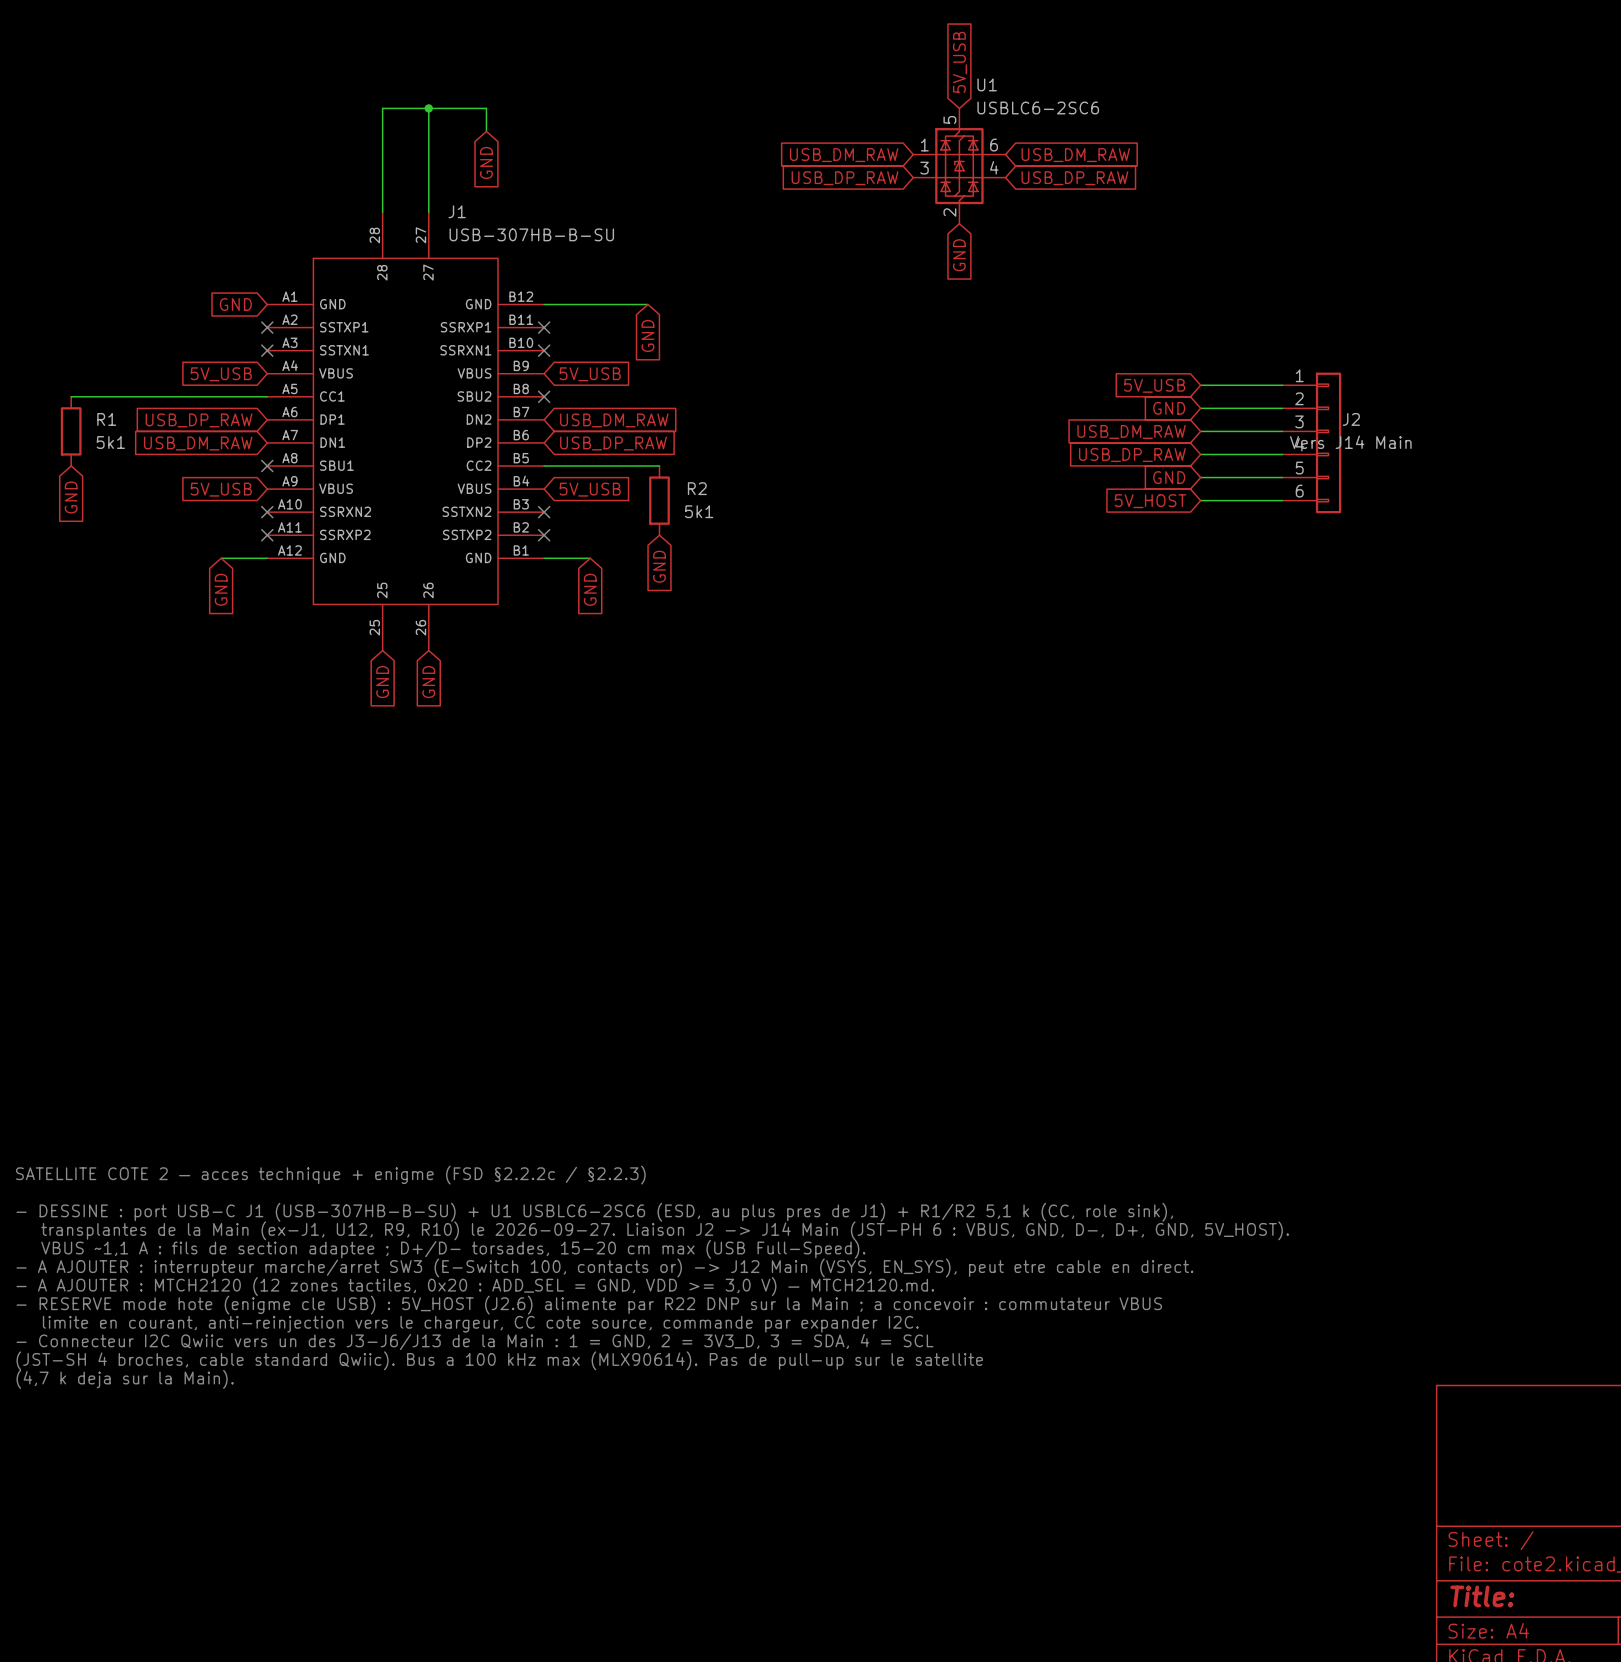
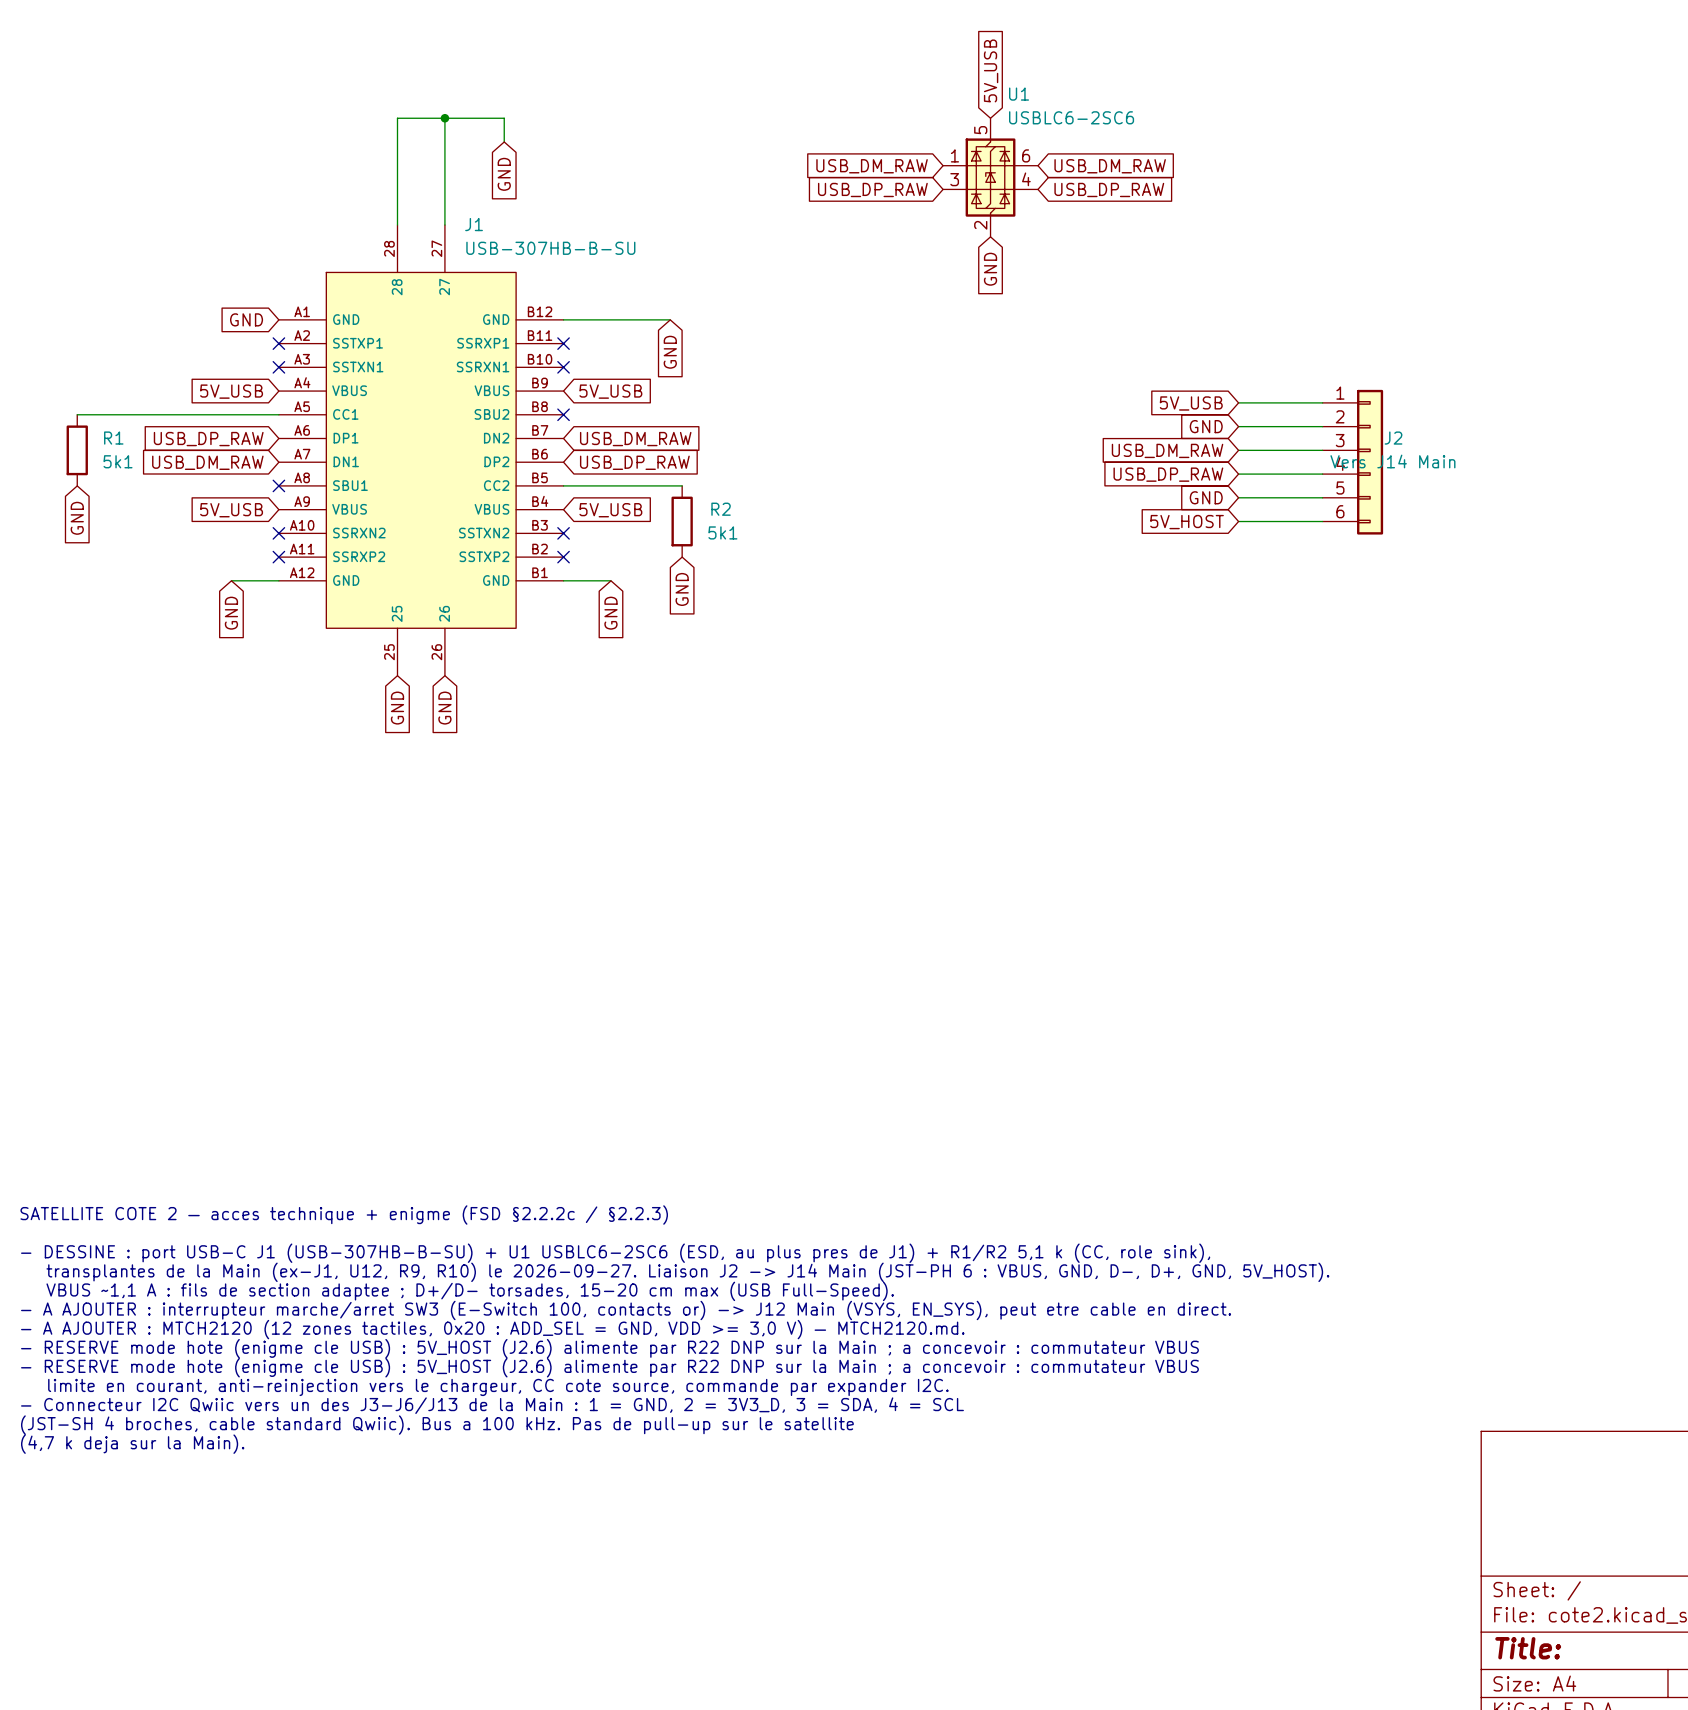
text: limite en courant, anti-reinjection vers le chargeur, CC cote source, commande par expander I2C. (480, 1324) -> - RESERVE mode hote (enigme cle USB) : 5V_HOST (J2.6) alimente par R22 DNP sur la Main ; a concevoir : commutateur VBUS (609, 1367)
text: - Connecteur I2C Qwiic vers un des J3-J6/J13 de la Main : 1 = GND, 2 = 3V3_D, 3 = SDA, 4 = SCL (475, 1341) -> limite en courant, anti-reinjection vers le chargeur, CC cote source, commande par expander I2C. (498, 1387)
text: (JST-SH 4 broches, cable standard Qwiic). Bus a 100 kHz max (MLX90614). Pas de pull-up sur le satellite (499, 1360) -> - Connecteur I2C Qwiic vers un des J3-J6/J13 de la Main : 1 = GND, 2 = 3V3_D, 3 = SDA, 4 = SCL (492, 1405)
text: (4,7 k deja sur la Main). (125, 1379) -> (JST-SH 4 broches, cable standard Qwiic). Bus a 100 kHz. Pas de pull-up sur le satellite (437, 1425)
text: none -> (4,7 k deja sur la Main). (132, 1444)

